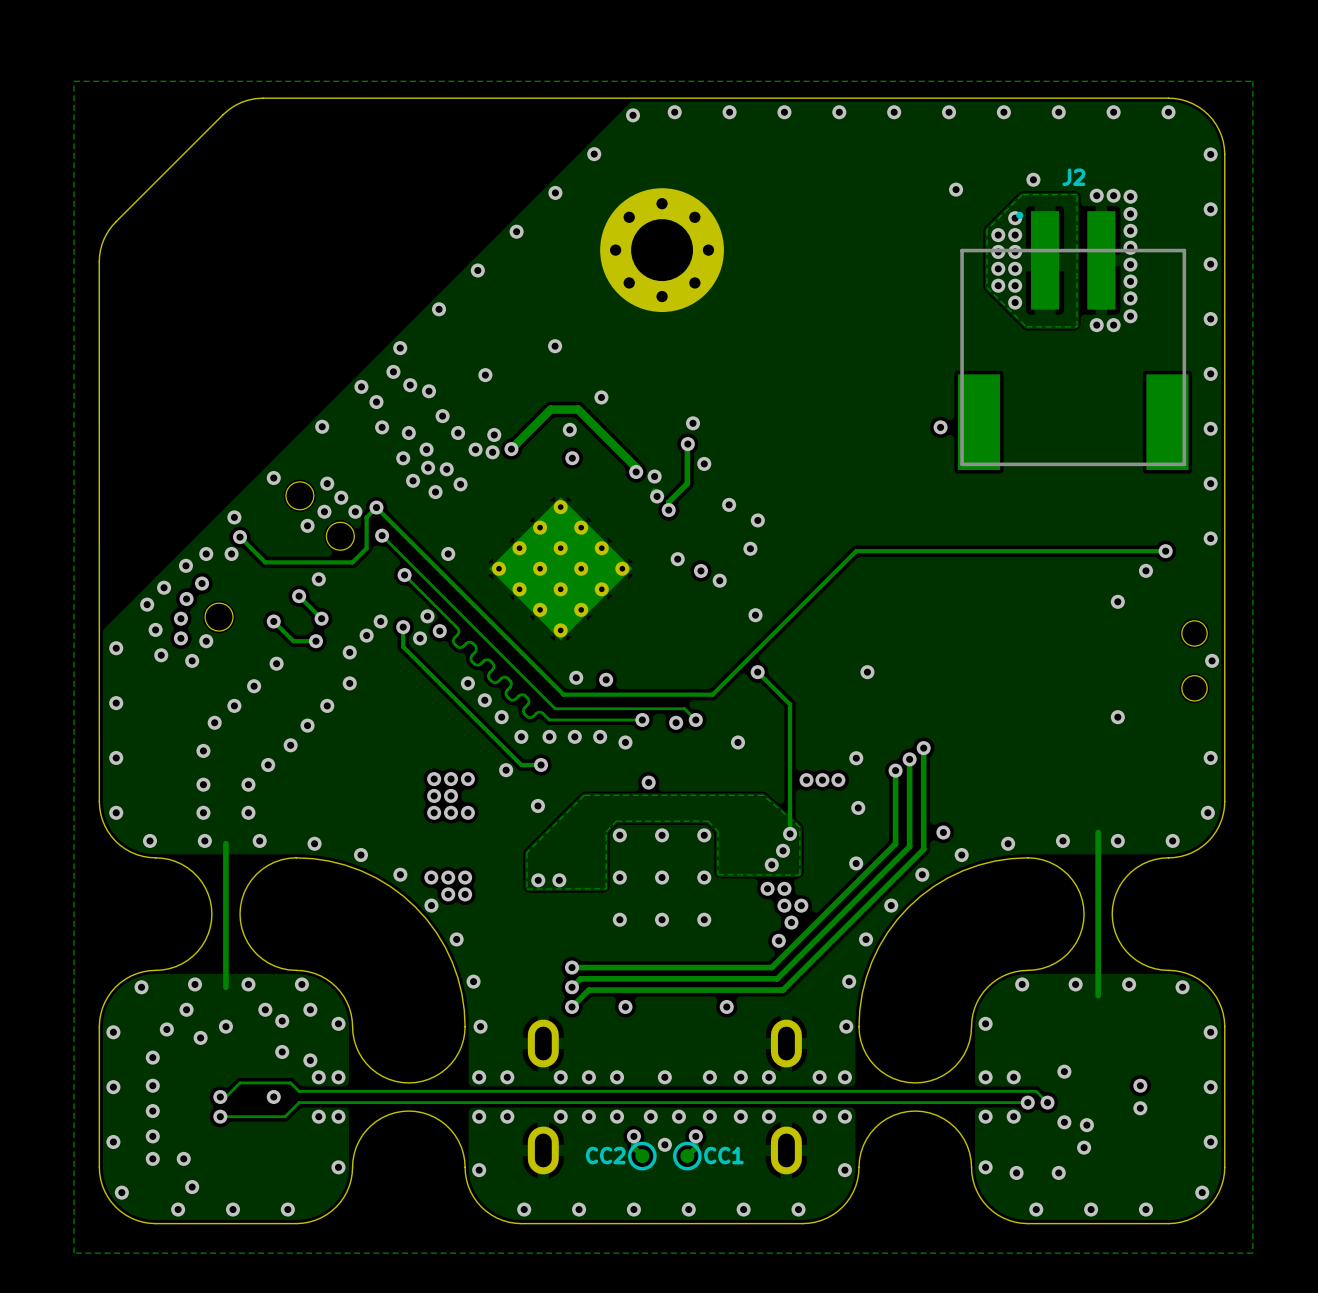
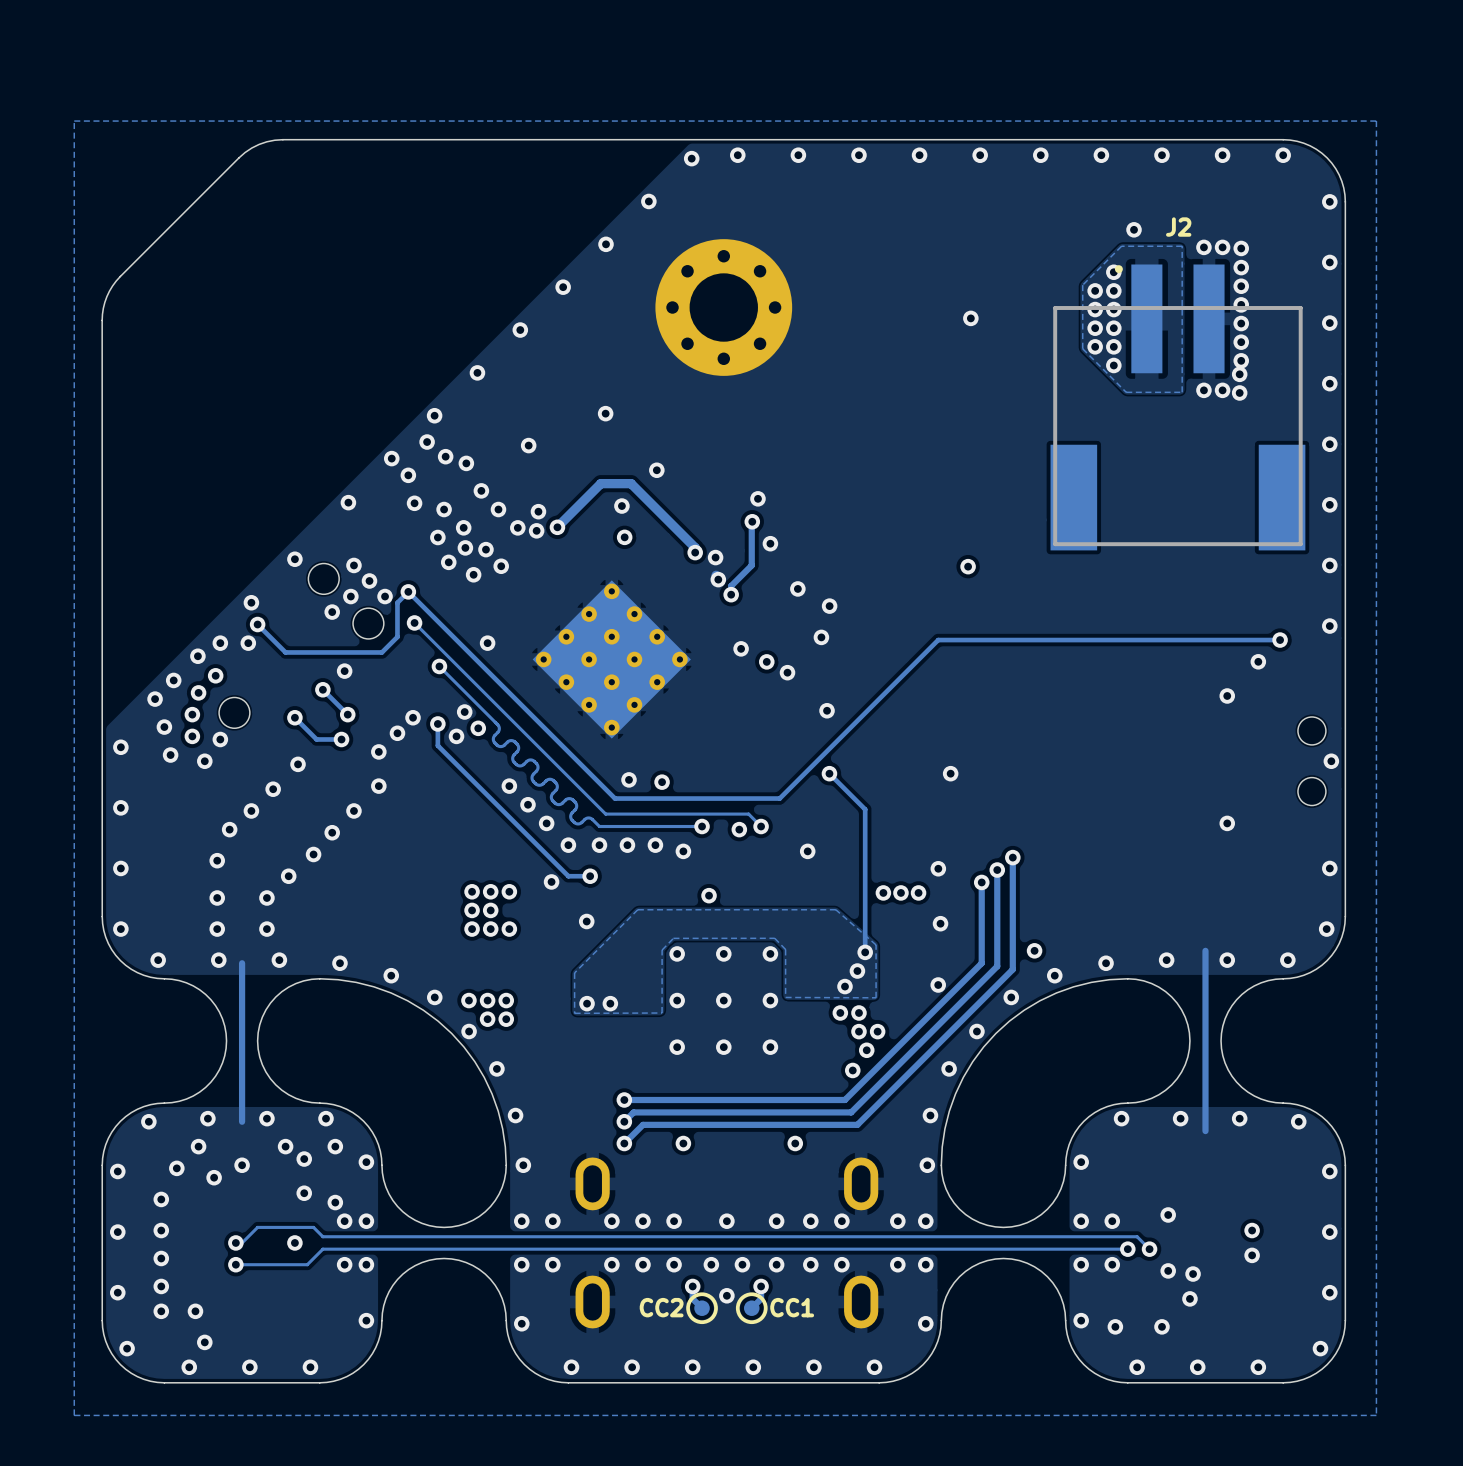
via: (956, 189) -> none
via: none -> (970, 318)
via: none -> (1239, 374)
via: (1130, 316) -> none
via: none -> (1239, 392)
via position: (940, 427) -> (968, 566)

